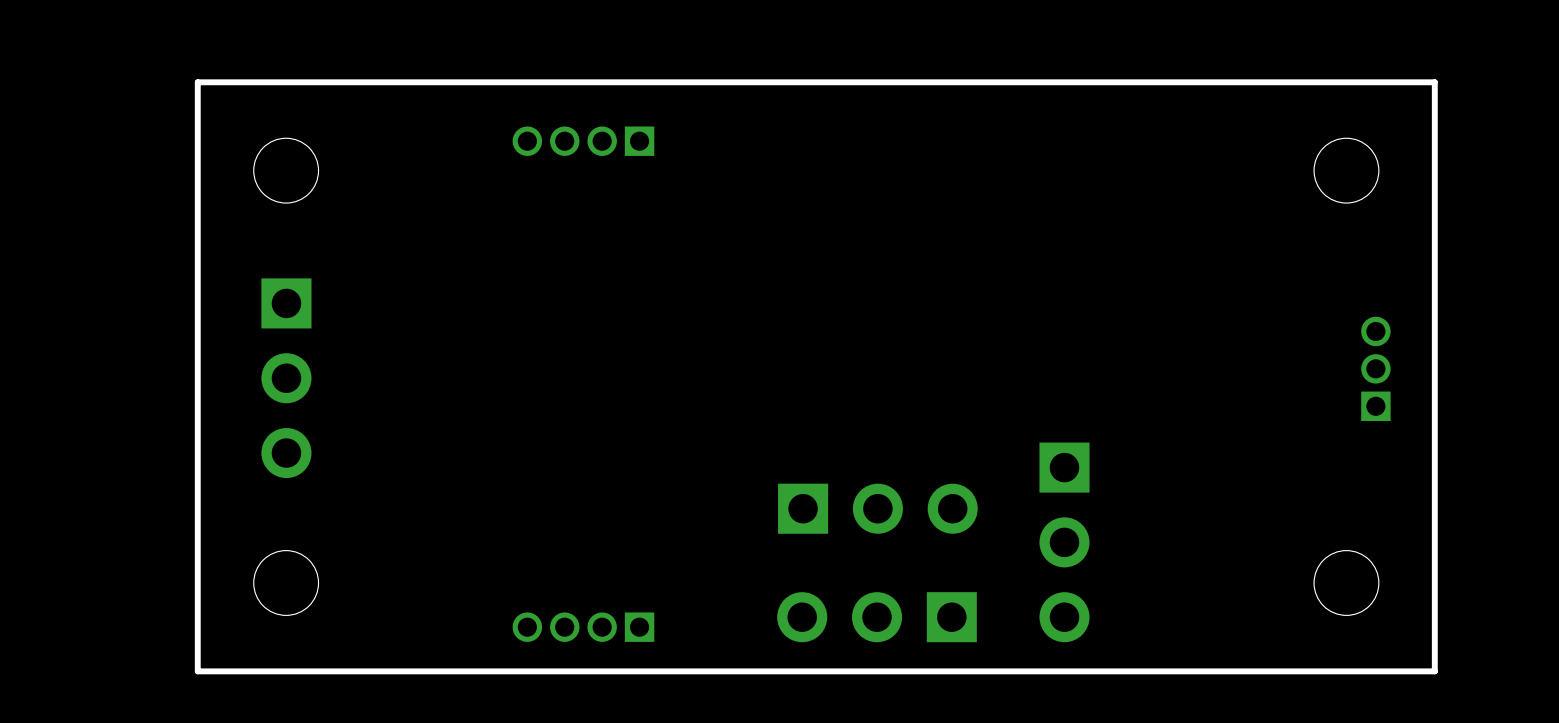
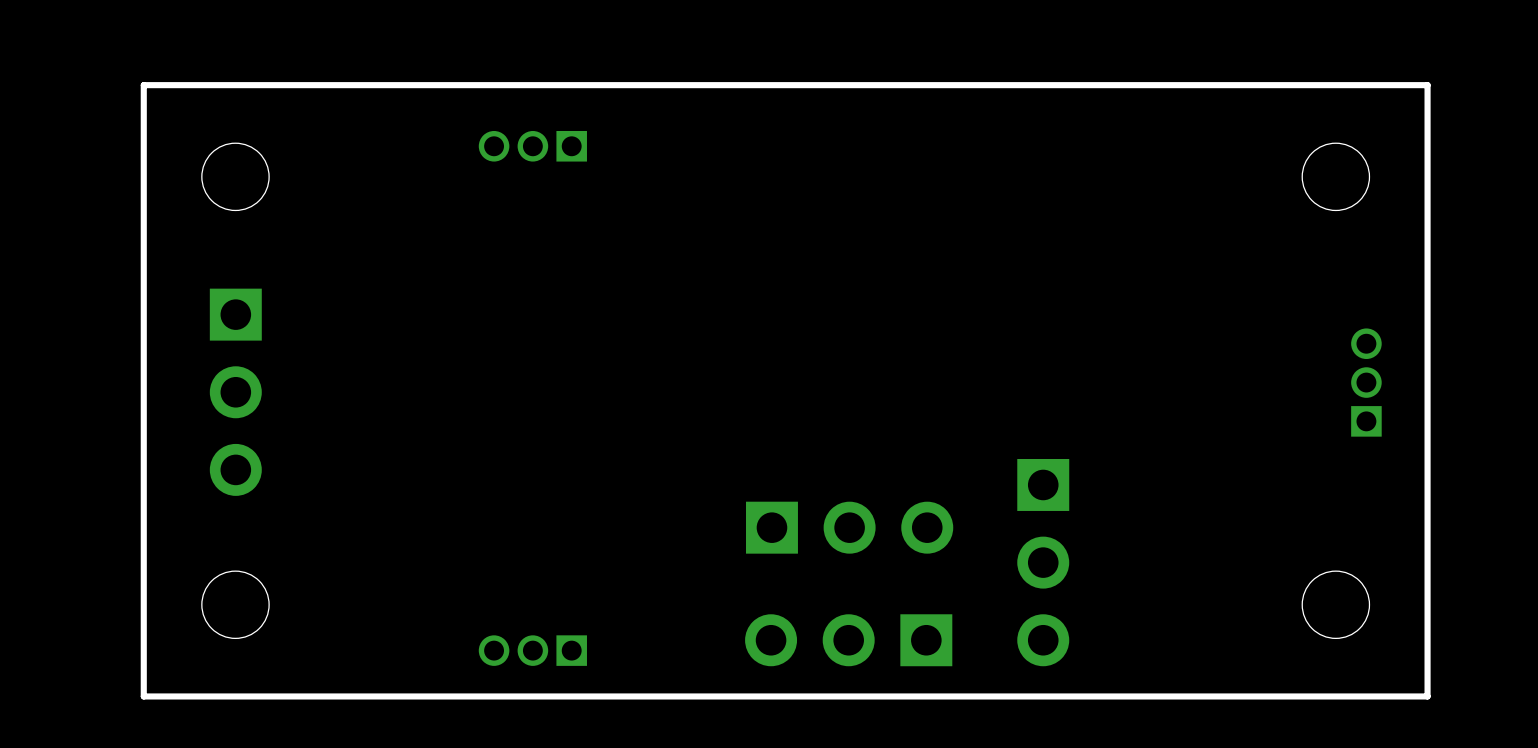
part footprint: [512, 126, 655, 156] -> [478, 130, 587, 162]
part footprint: [512, 612, 655, 642] -> [478, 635, 587, 666]

